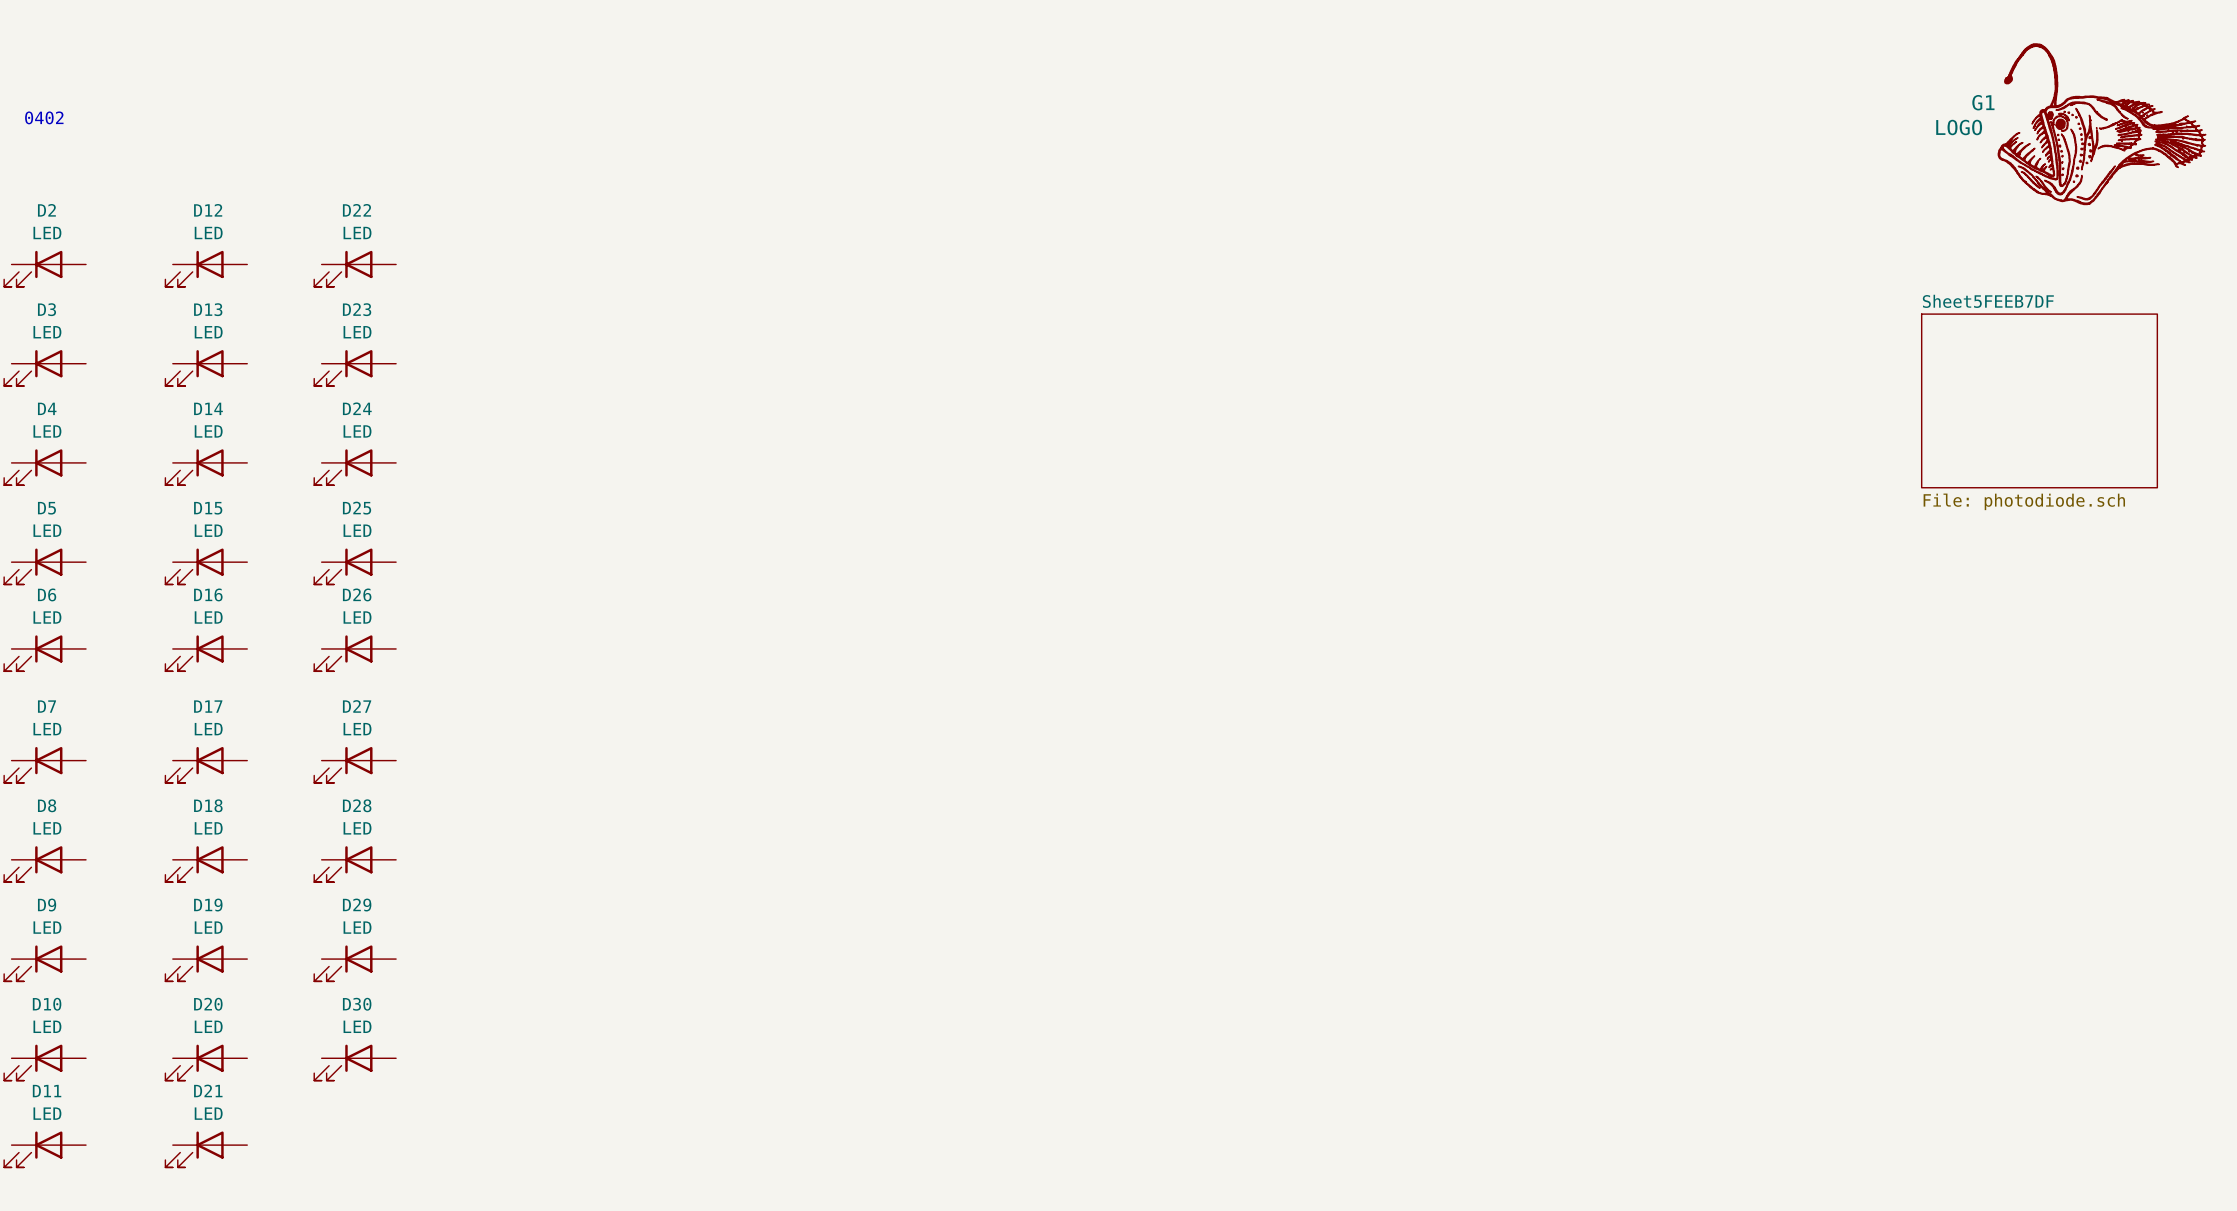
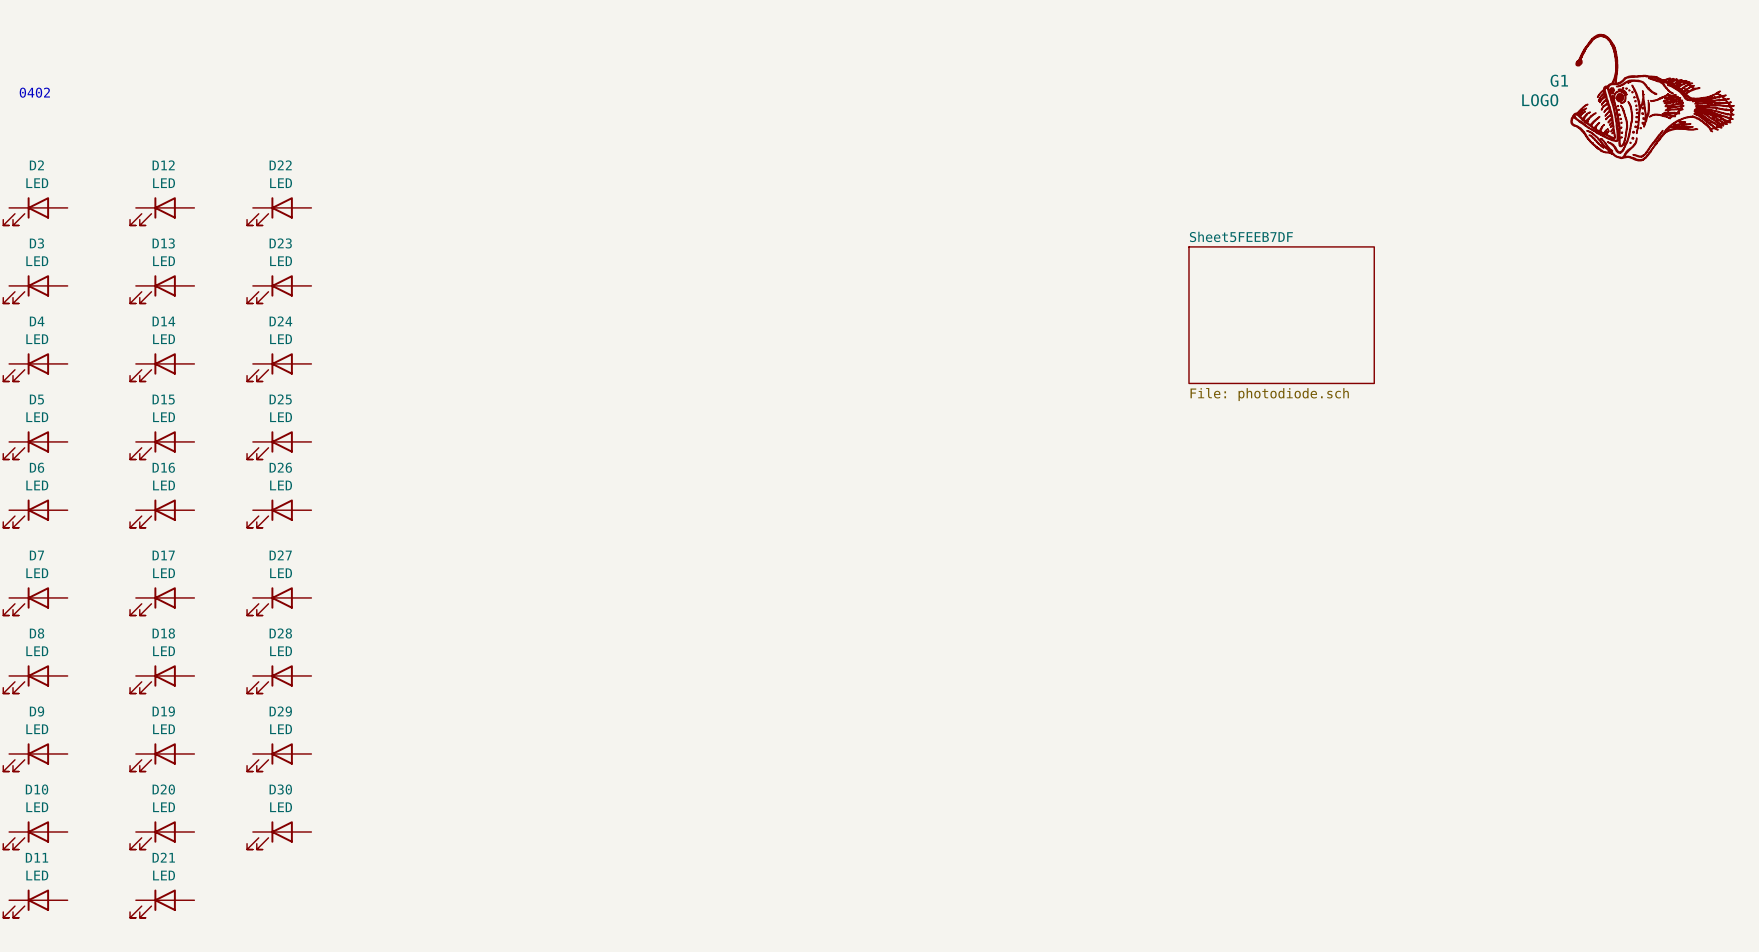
sheet Sheet5FEEB7DF position: (2039, 400) -> (1281, 315)

